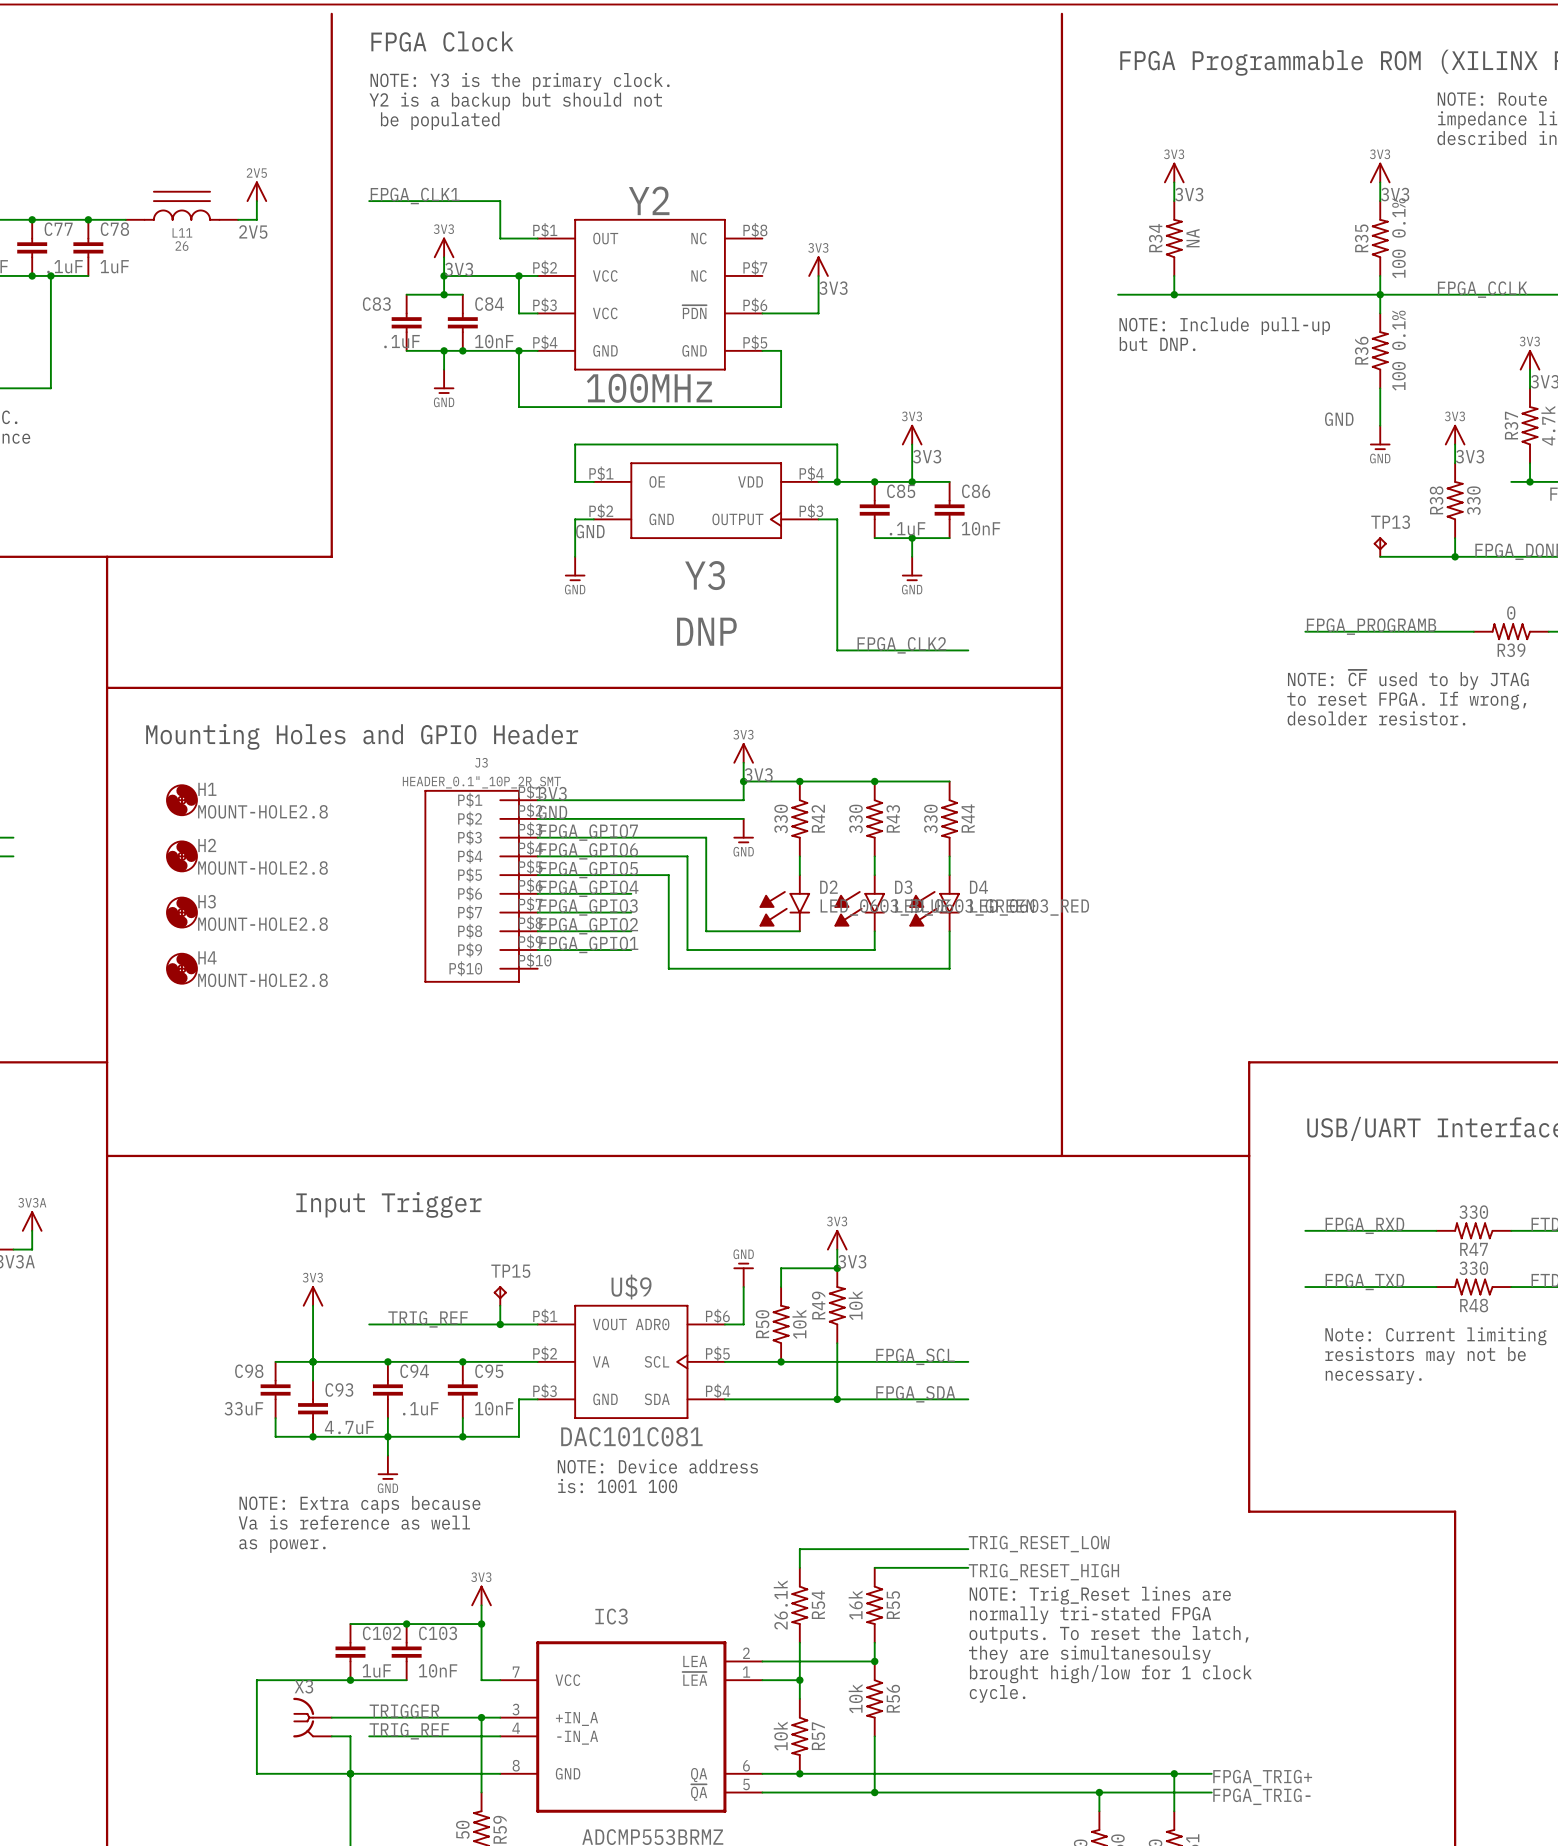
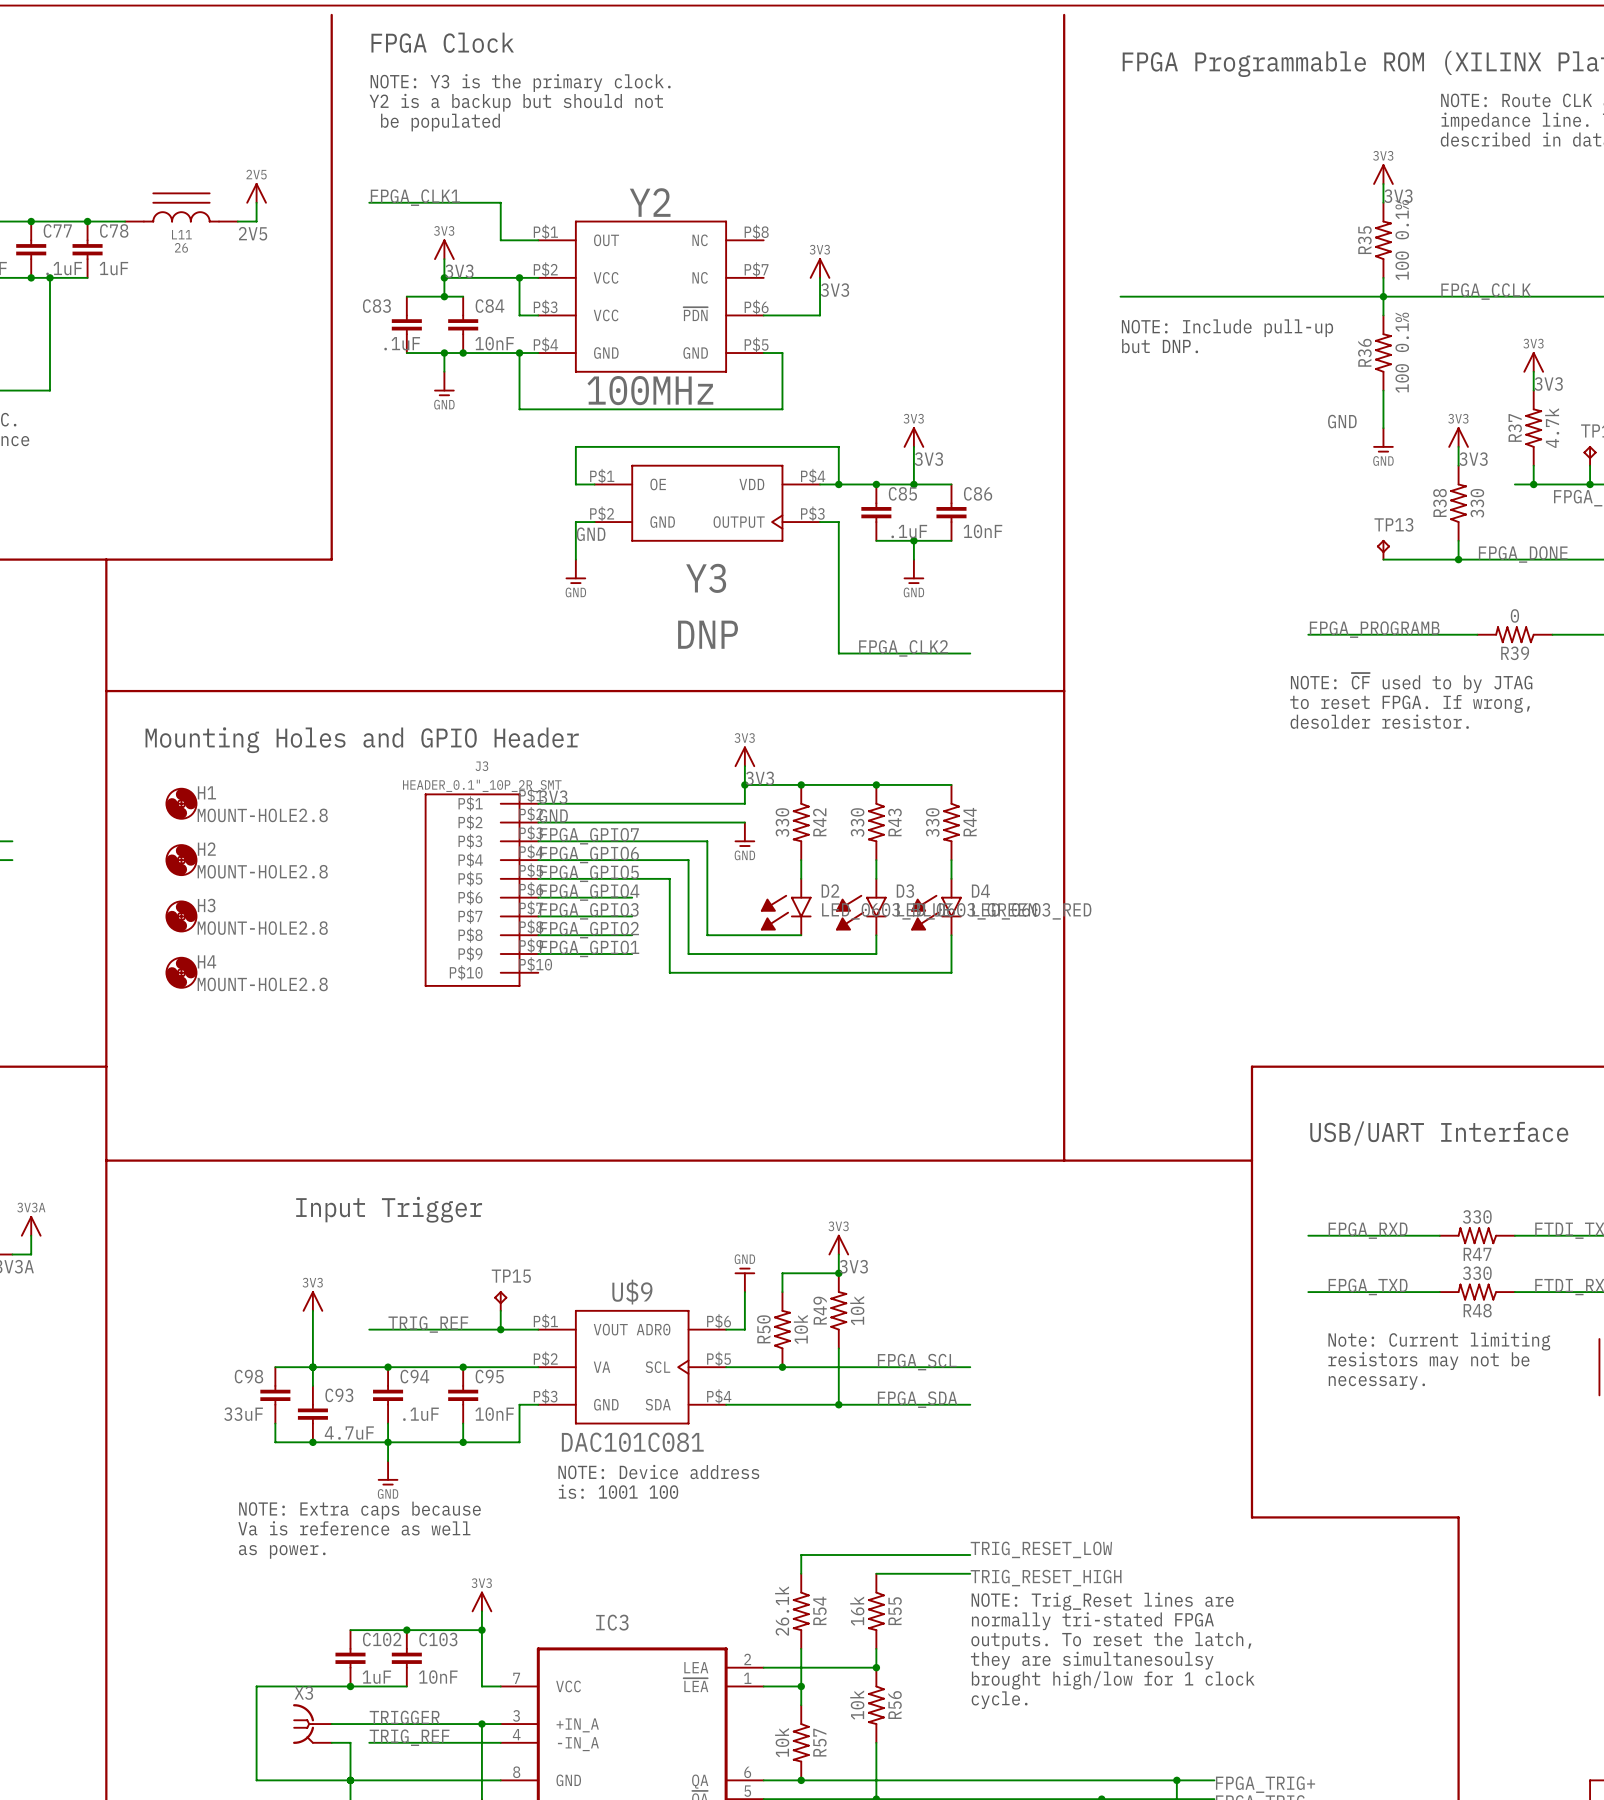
power symbol: (1174, 173) -> none
wire: (1174, 182) (1174, 201) -> none
label: 3V3 (1189, 194) -> none
R34: NA (1174, 238) -> none
wire: (1174, 275) (1174, 294) -> none
junction: (1174, 294) -> none

